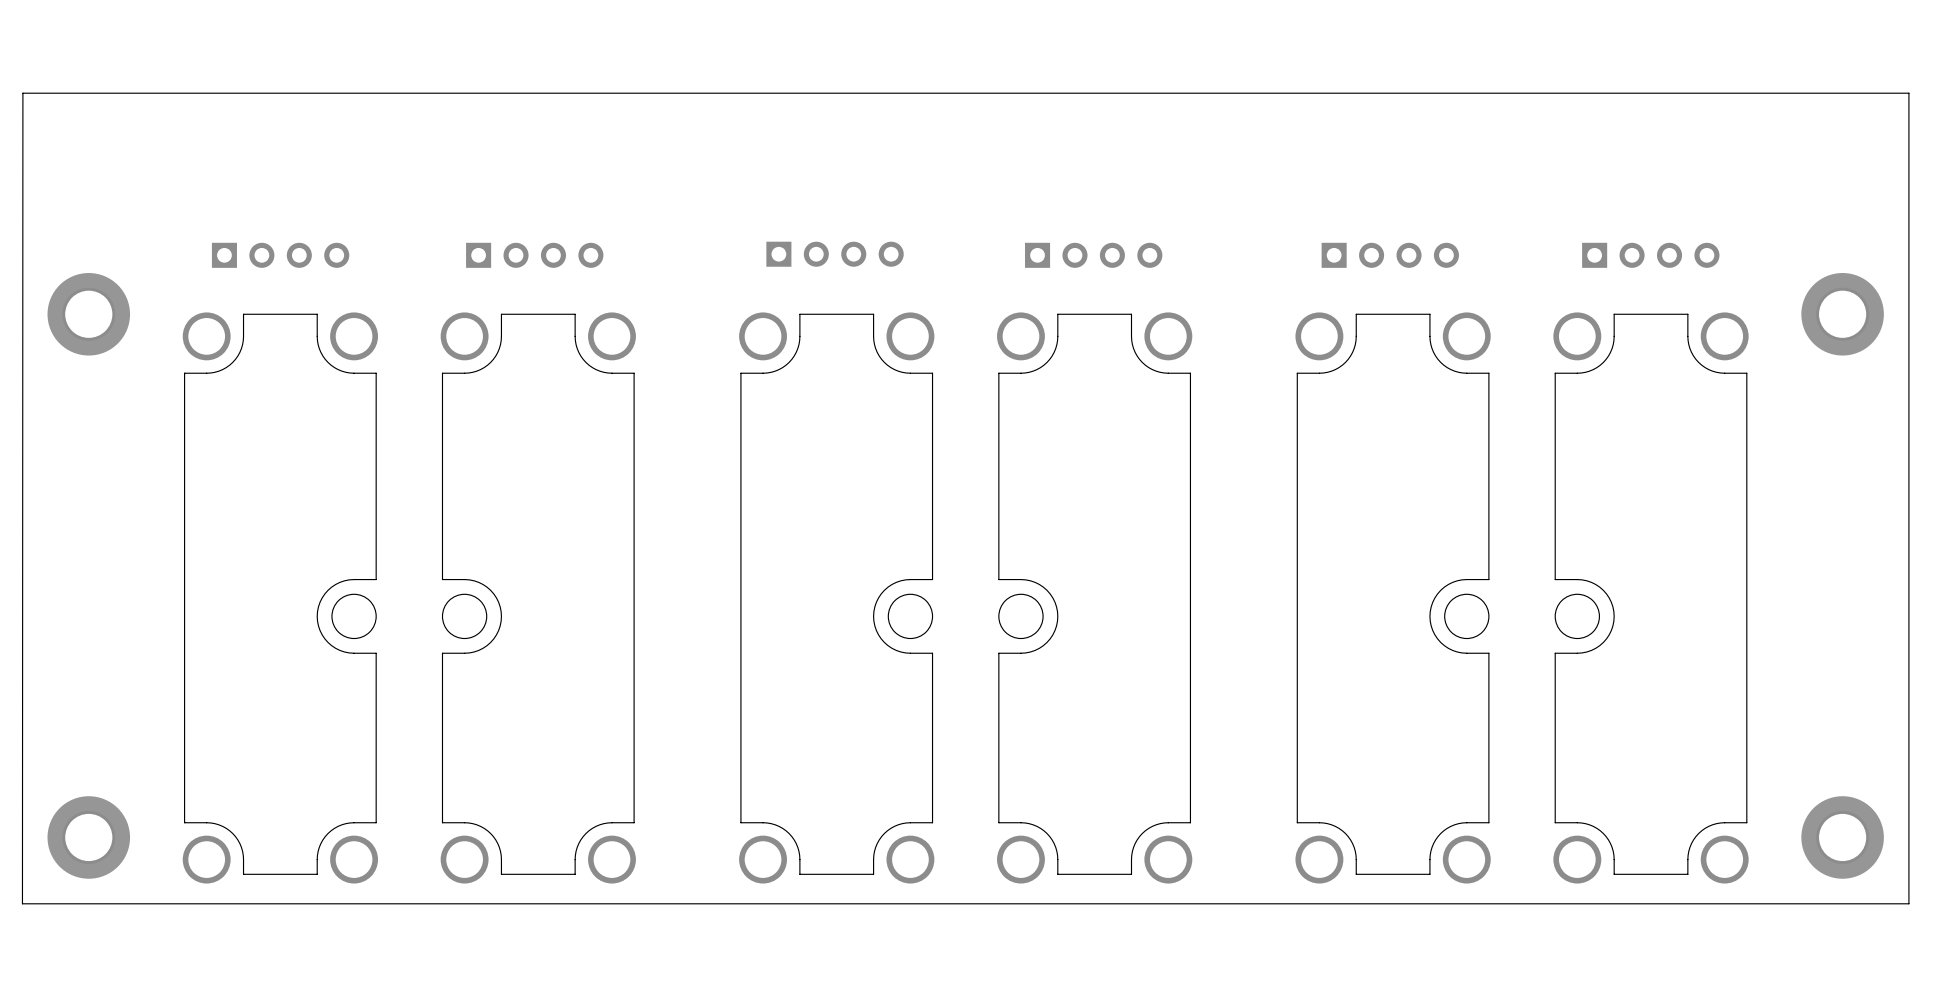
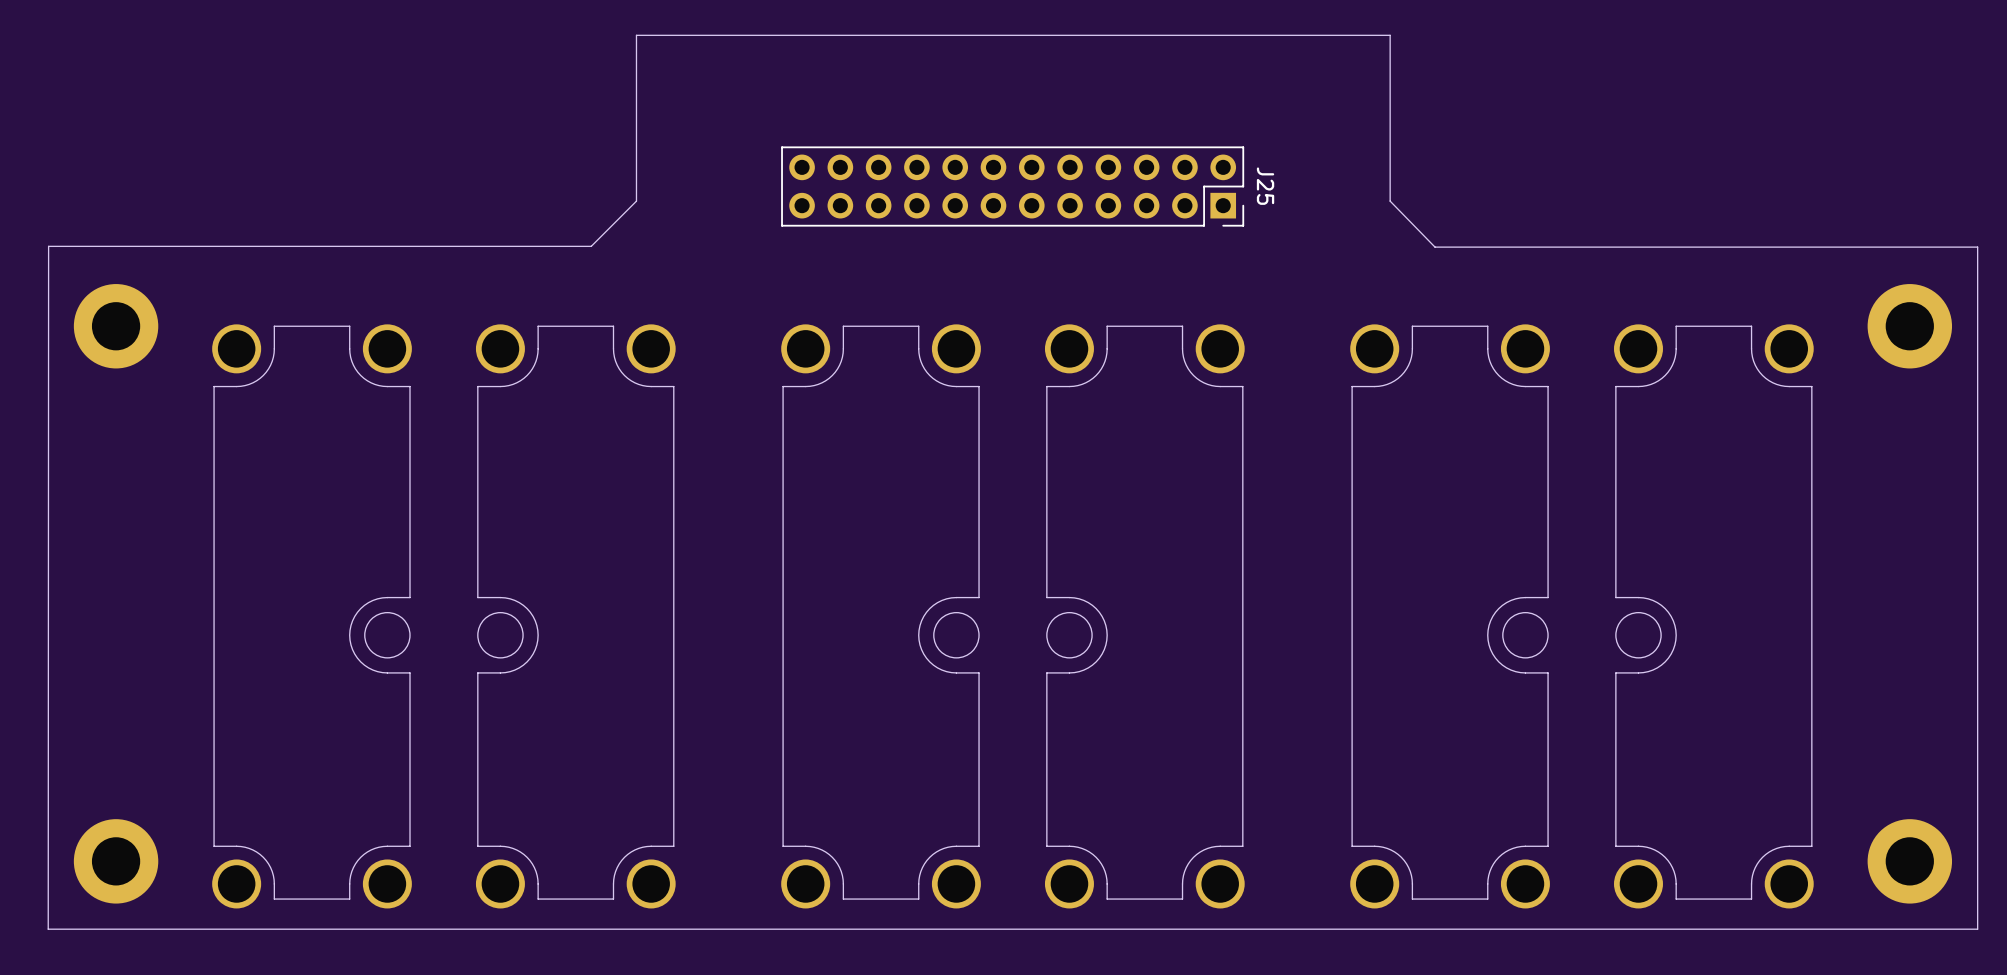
J25: none -> (1012, 186)
board edge: (22, 236) (22, 93) (1908, 93) (1908, 236) -> (48, 246) (591, 246) (636, 201) (636, 35) (1390, 35) (1390, 201) (1435, 247) (1977, 247)
part: (835, 254) -> none
part: (280, 255) -> none
part: (534, 255) -> none
part: (1093, 255) -> none
part: (1390, 255) -> none
part: (1650, 255) -> none

